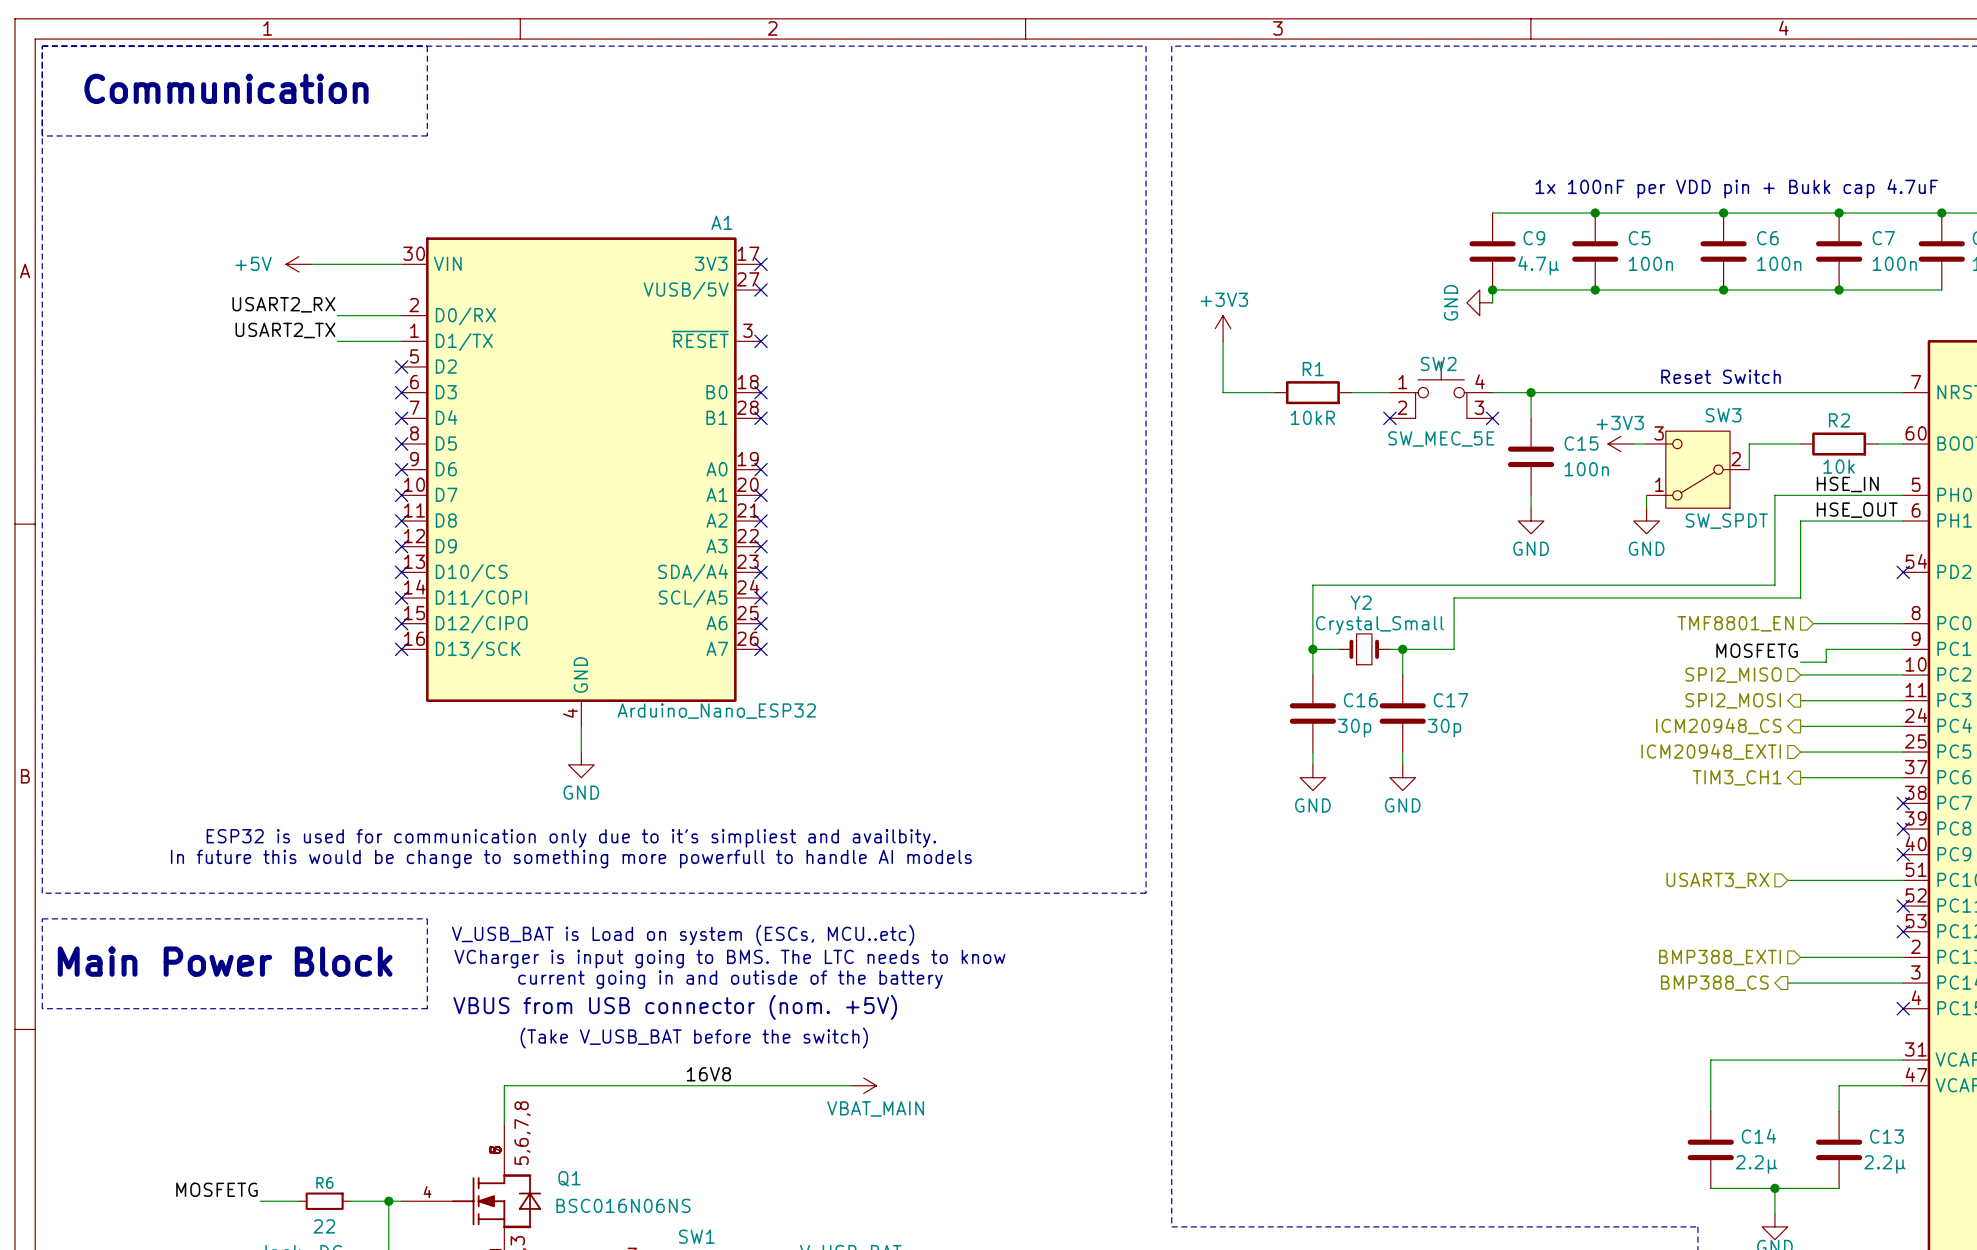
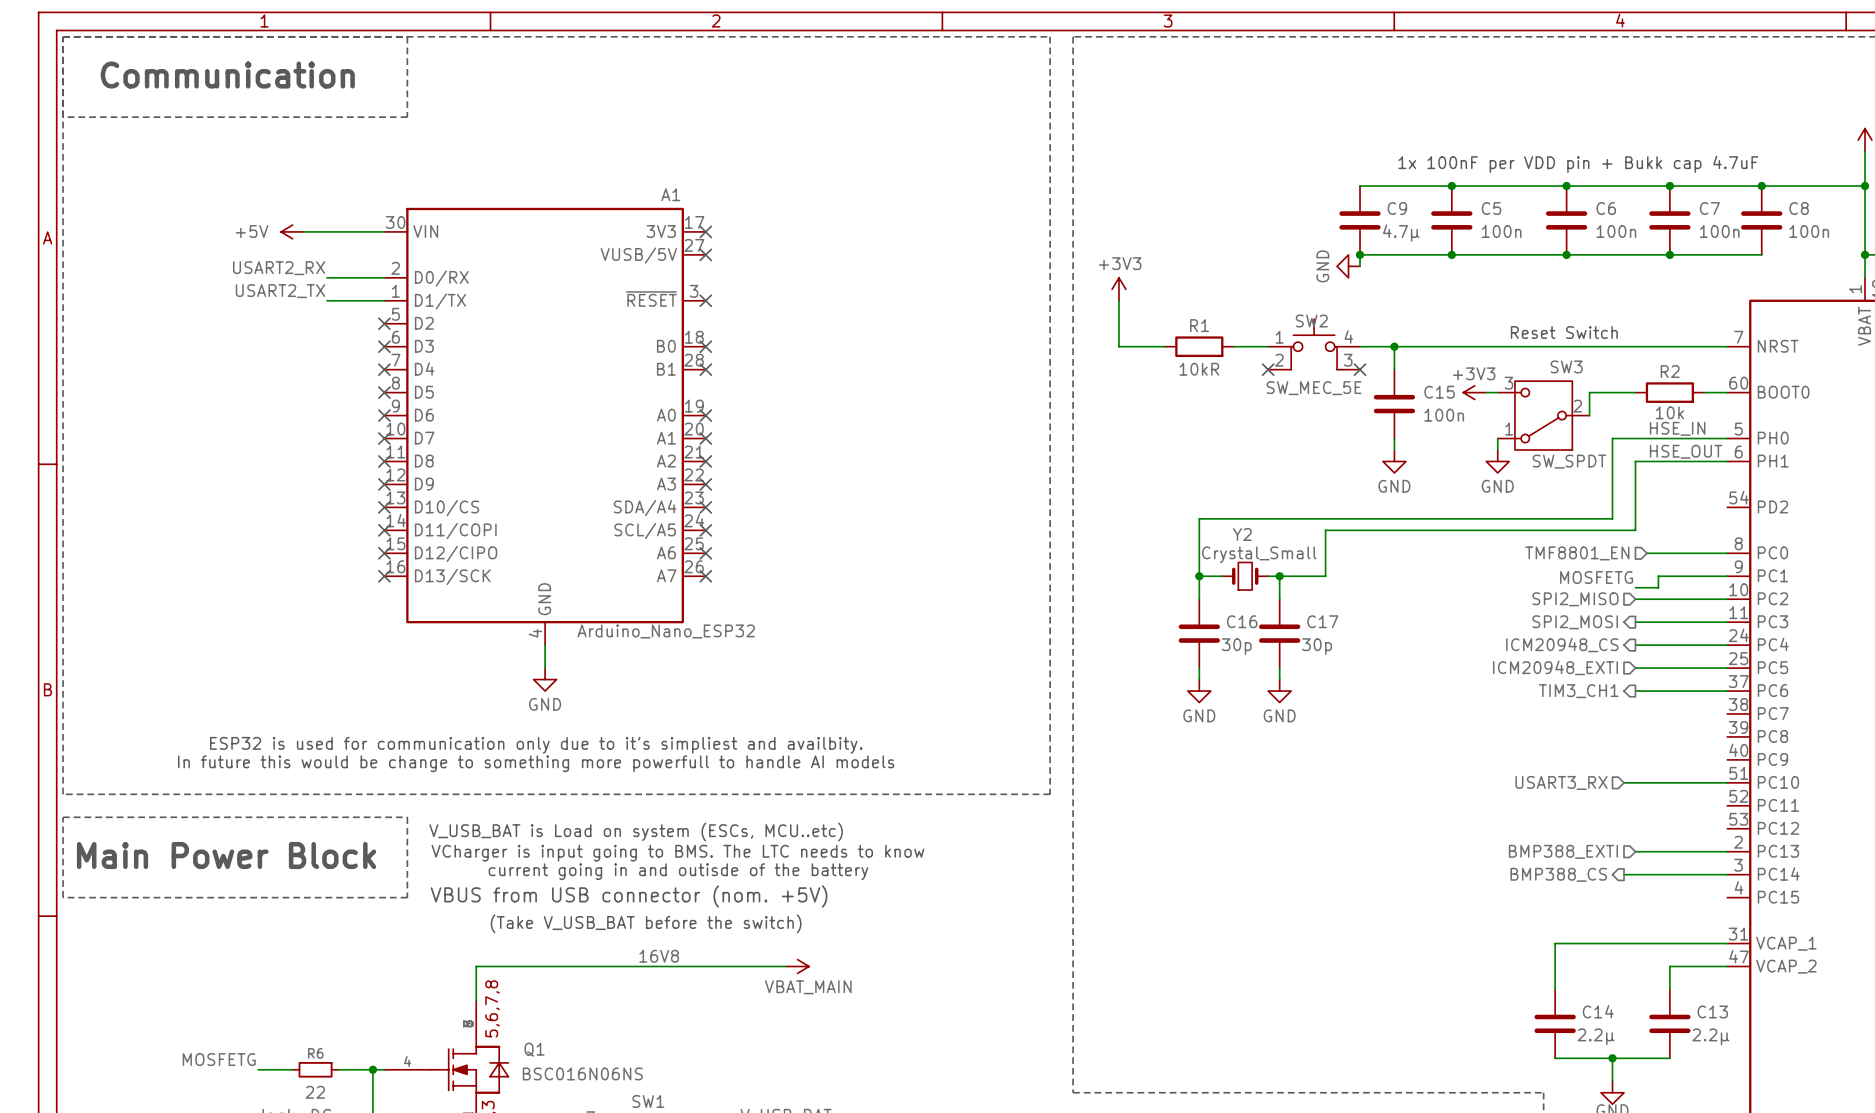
no-connect mark: (1903, 572) -> none
no-connect mark: (1903, 803) -> none
no-connect mark: (1903, 829) -> none
no-connect mark: (1903, 854) -> none
no-connect mark: (1903, 906) -> none
no-connect mark: (1903, 931) -> none
no-connect mark: (1903, 1008) -> none

